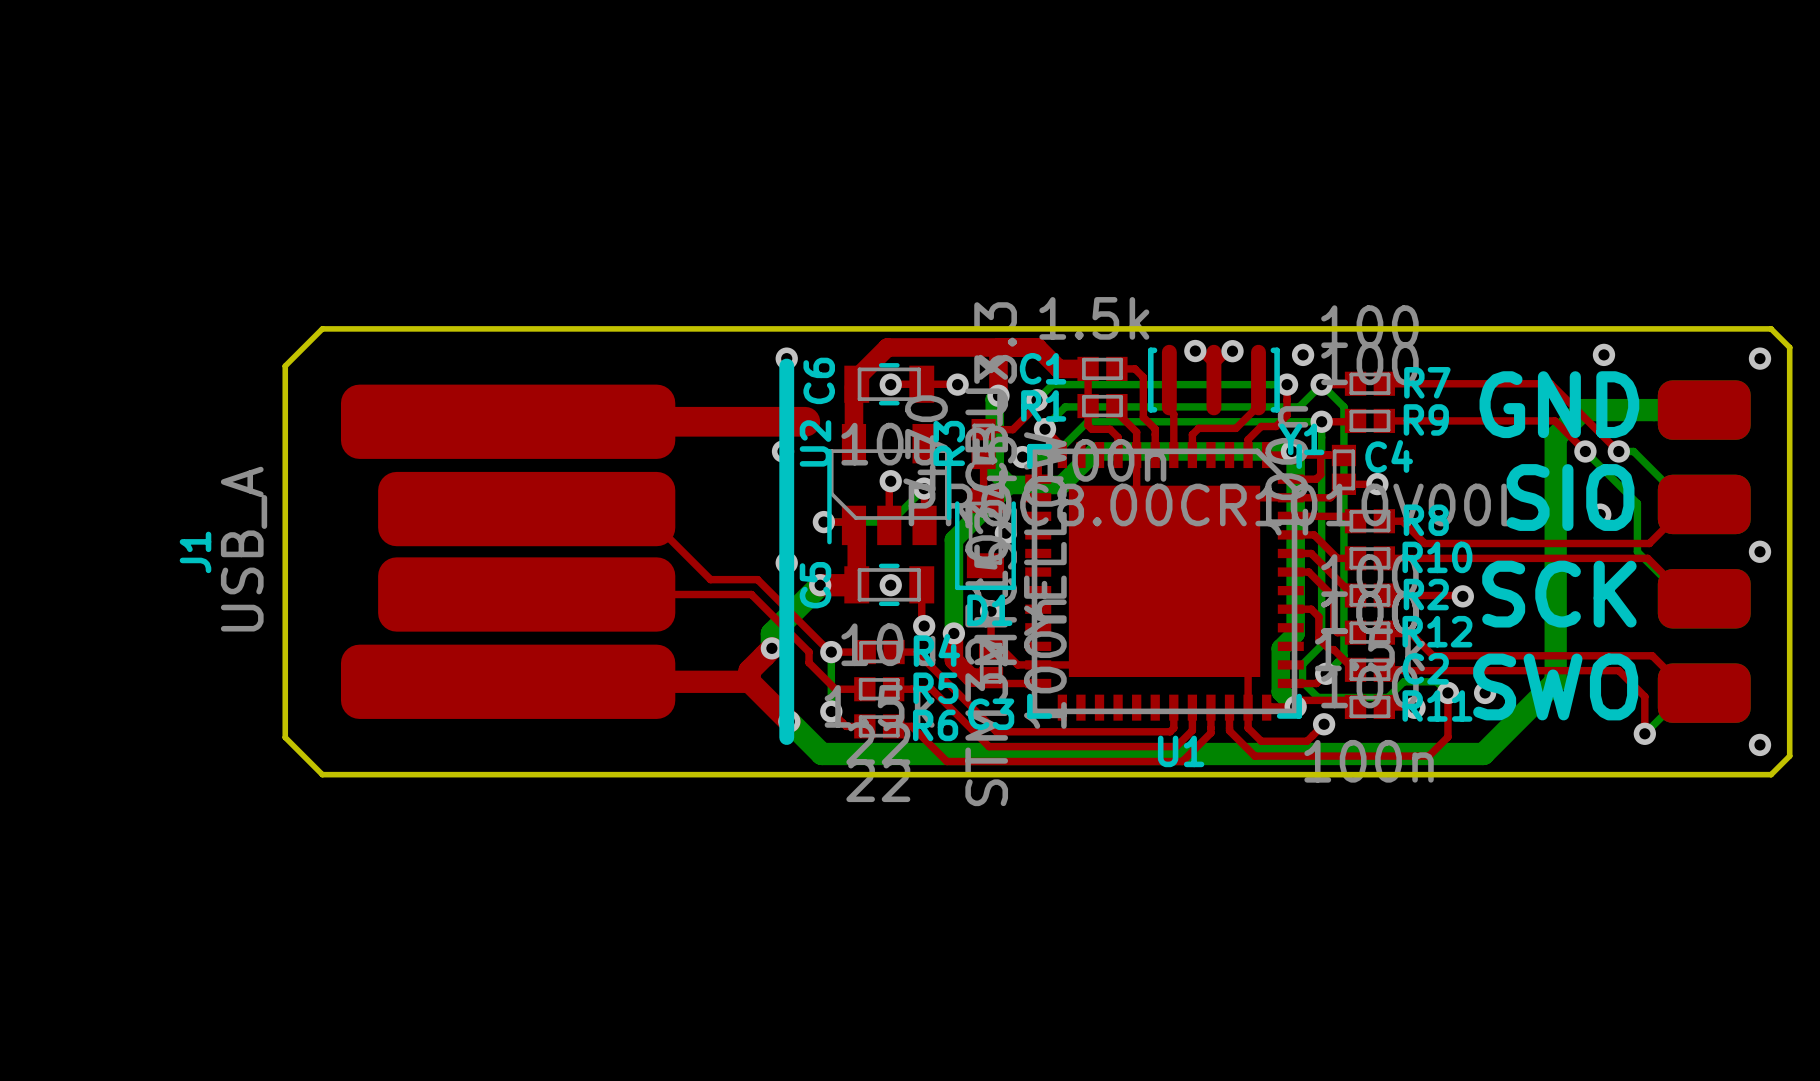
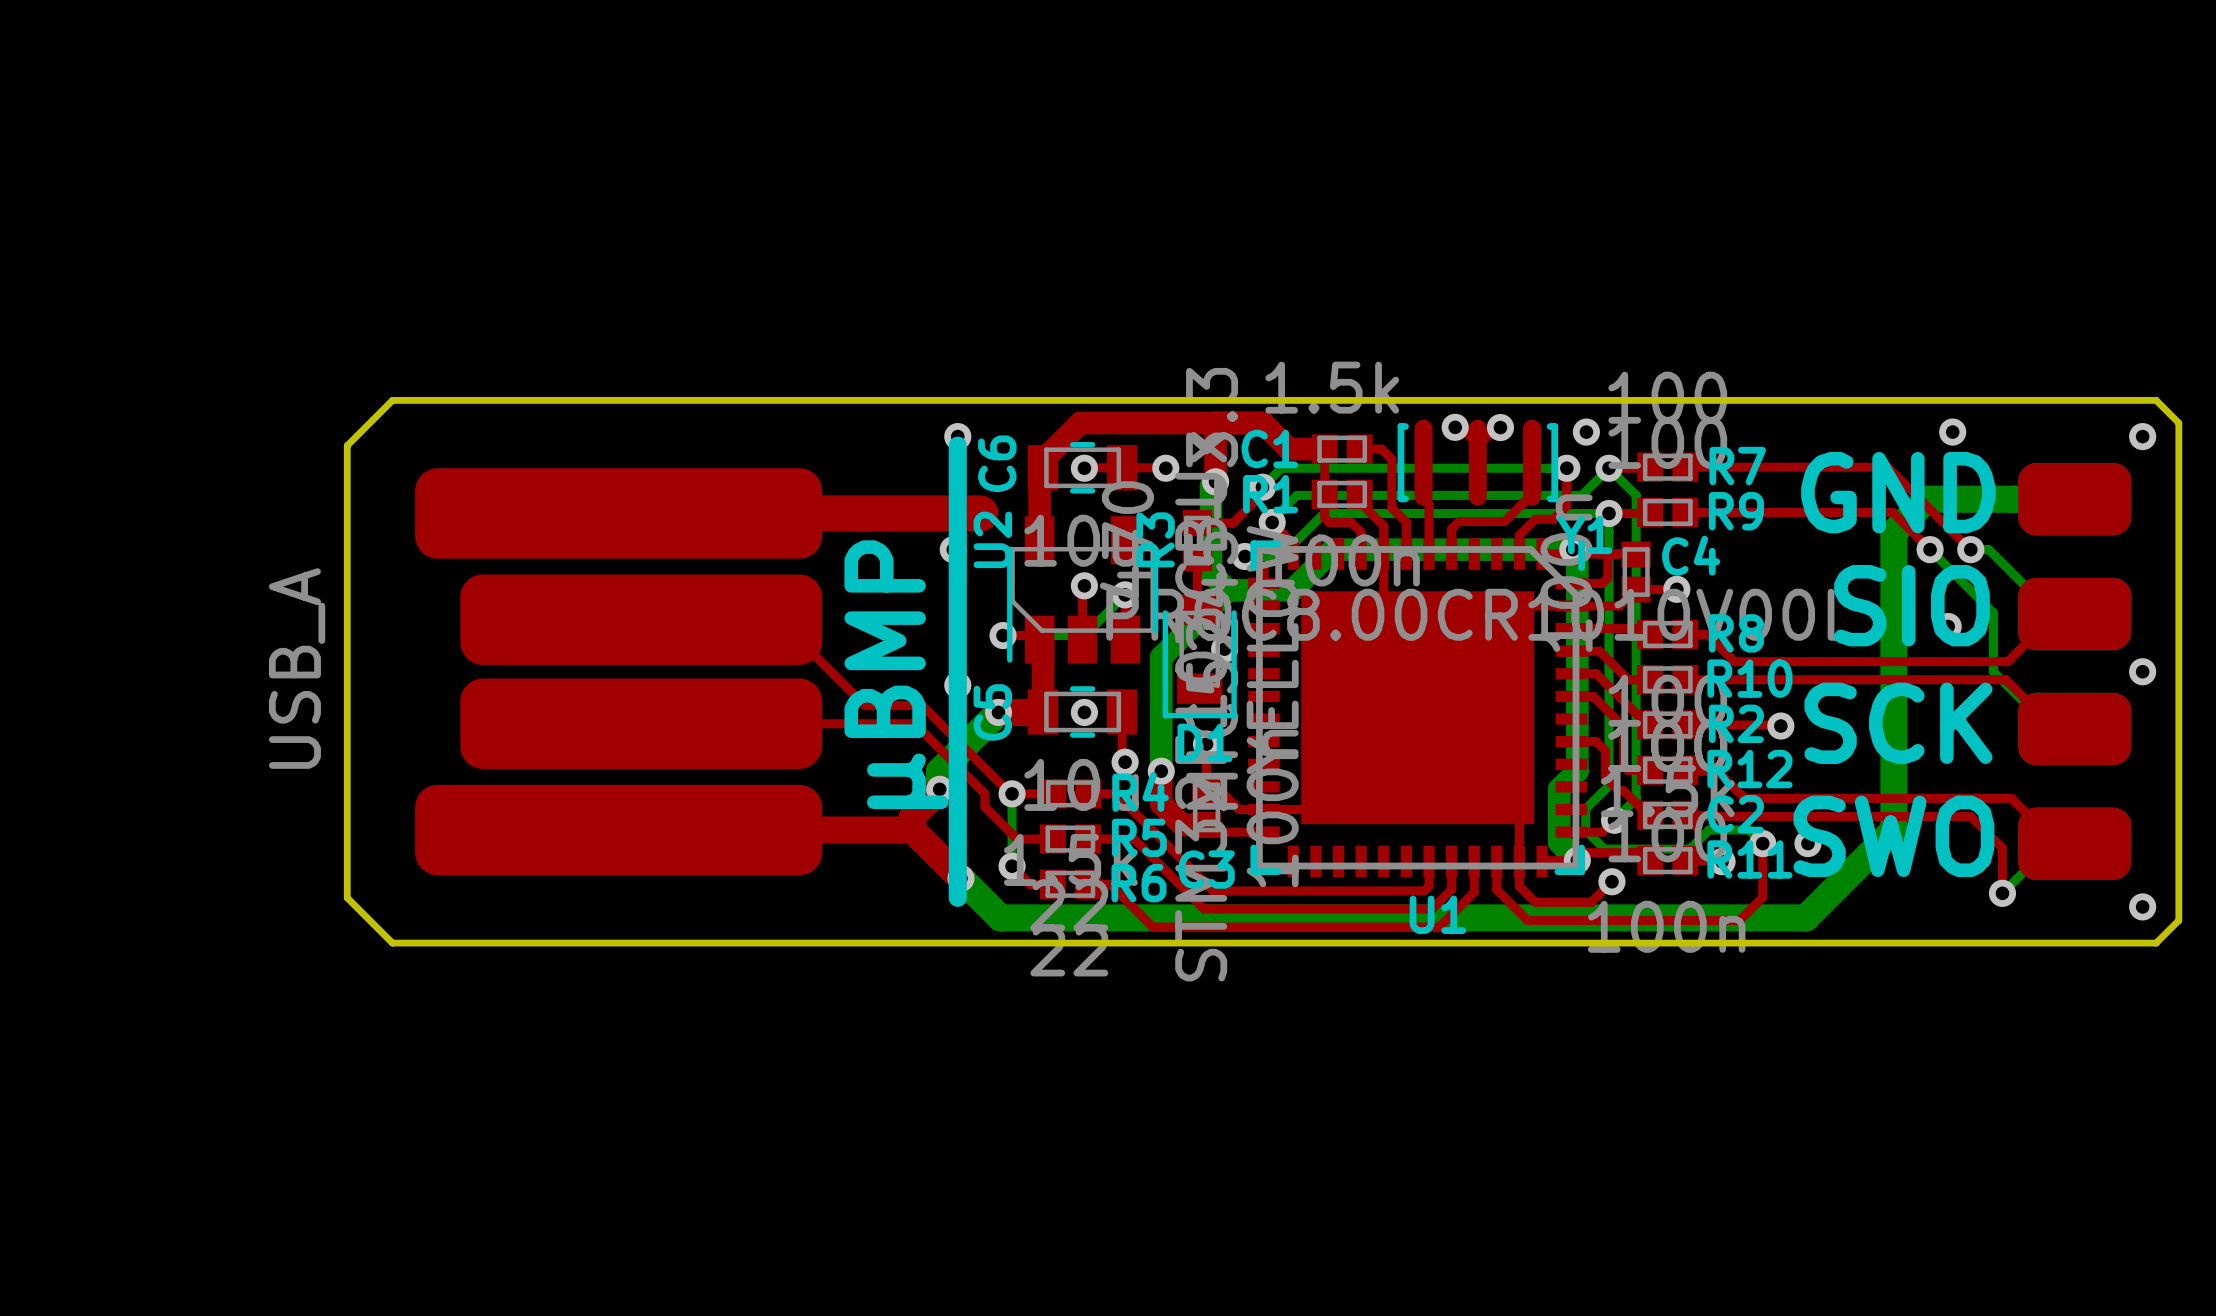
J1 name: J1 (195, 552) -> none
text: none -> µBMP (896, 674)

